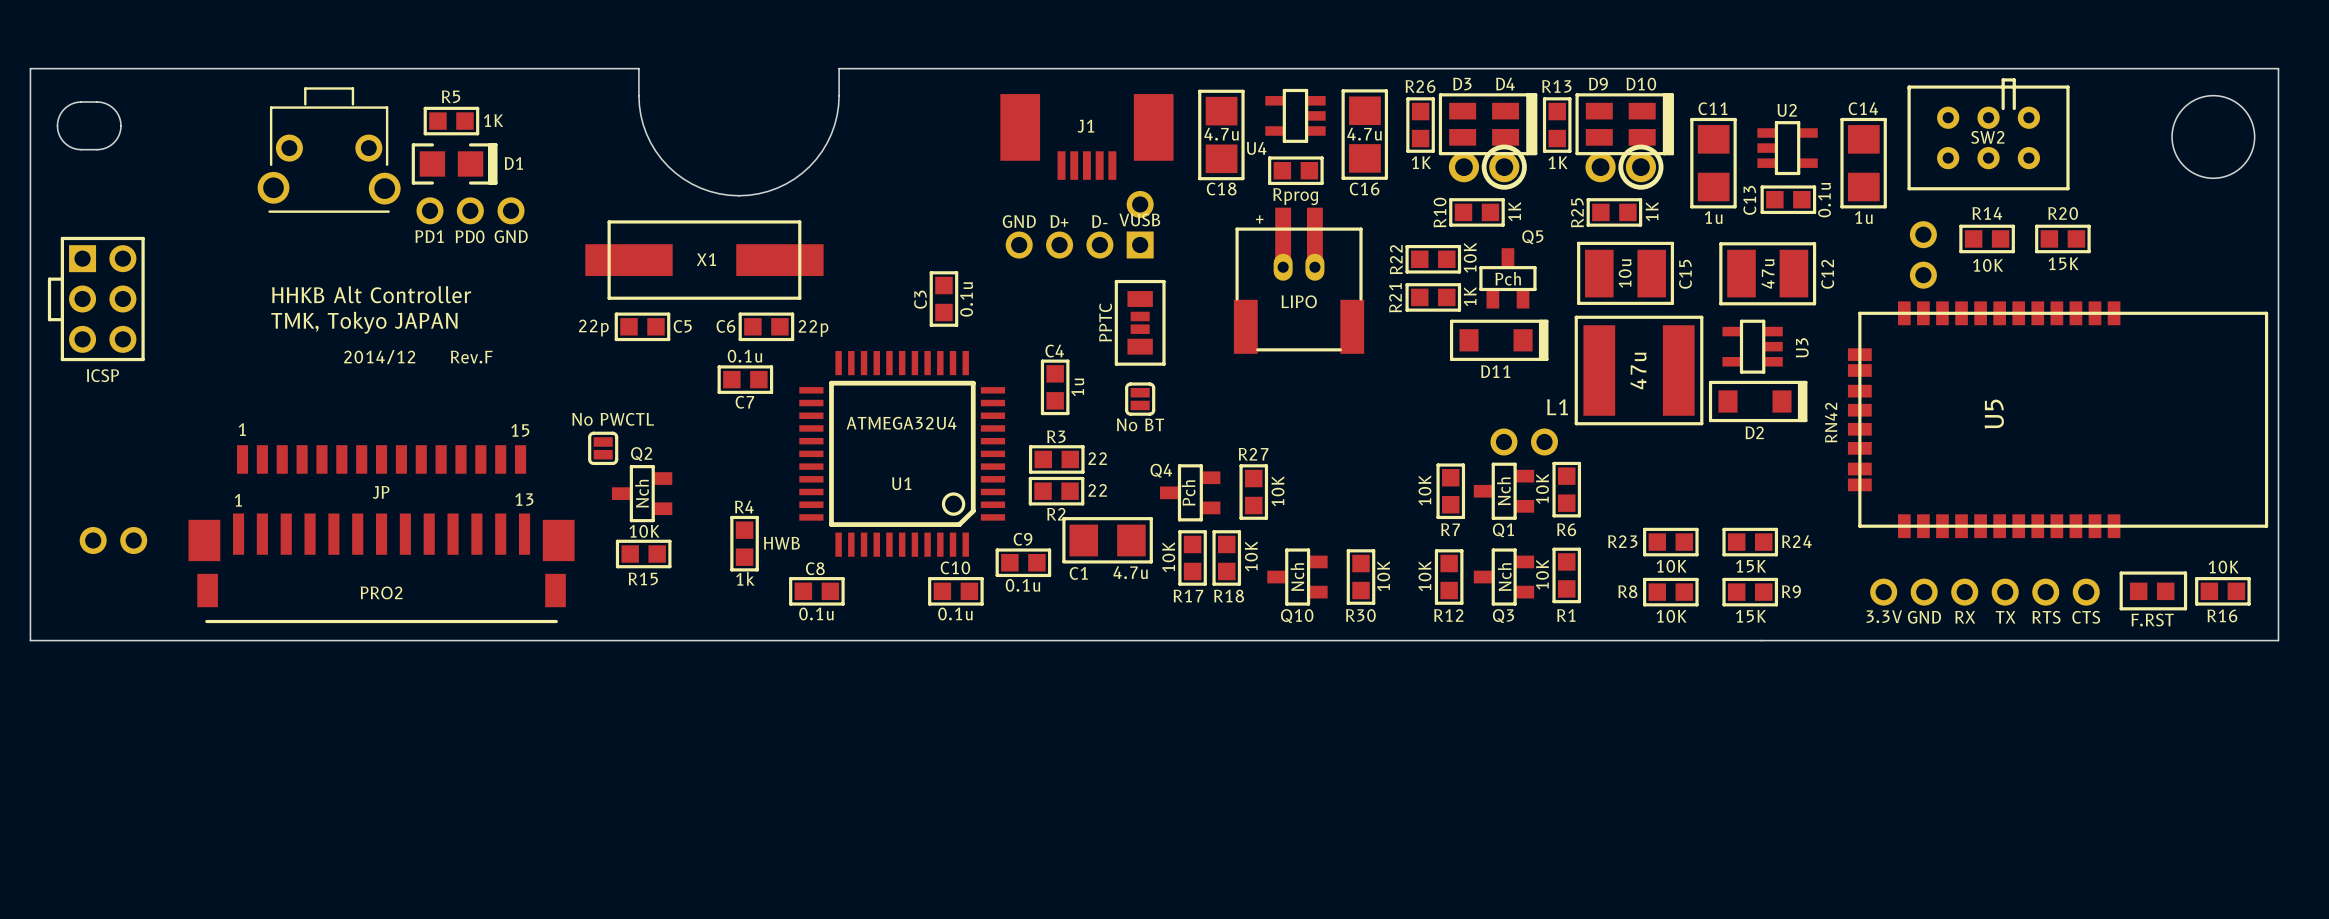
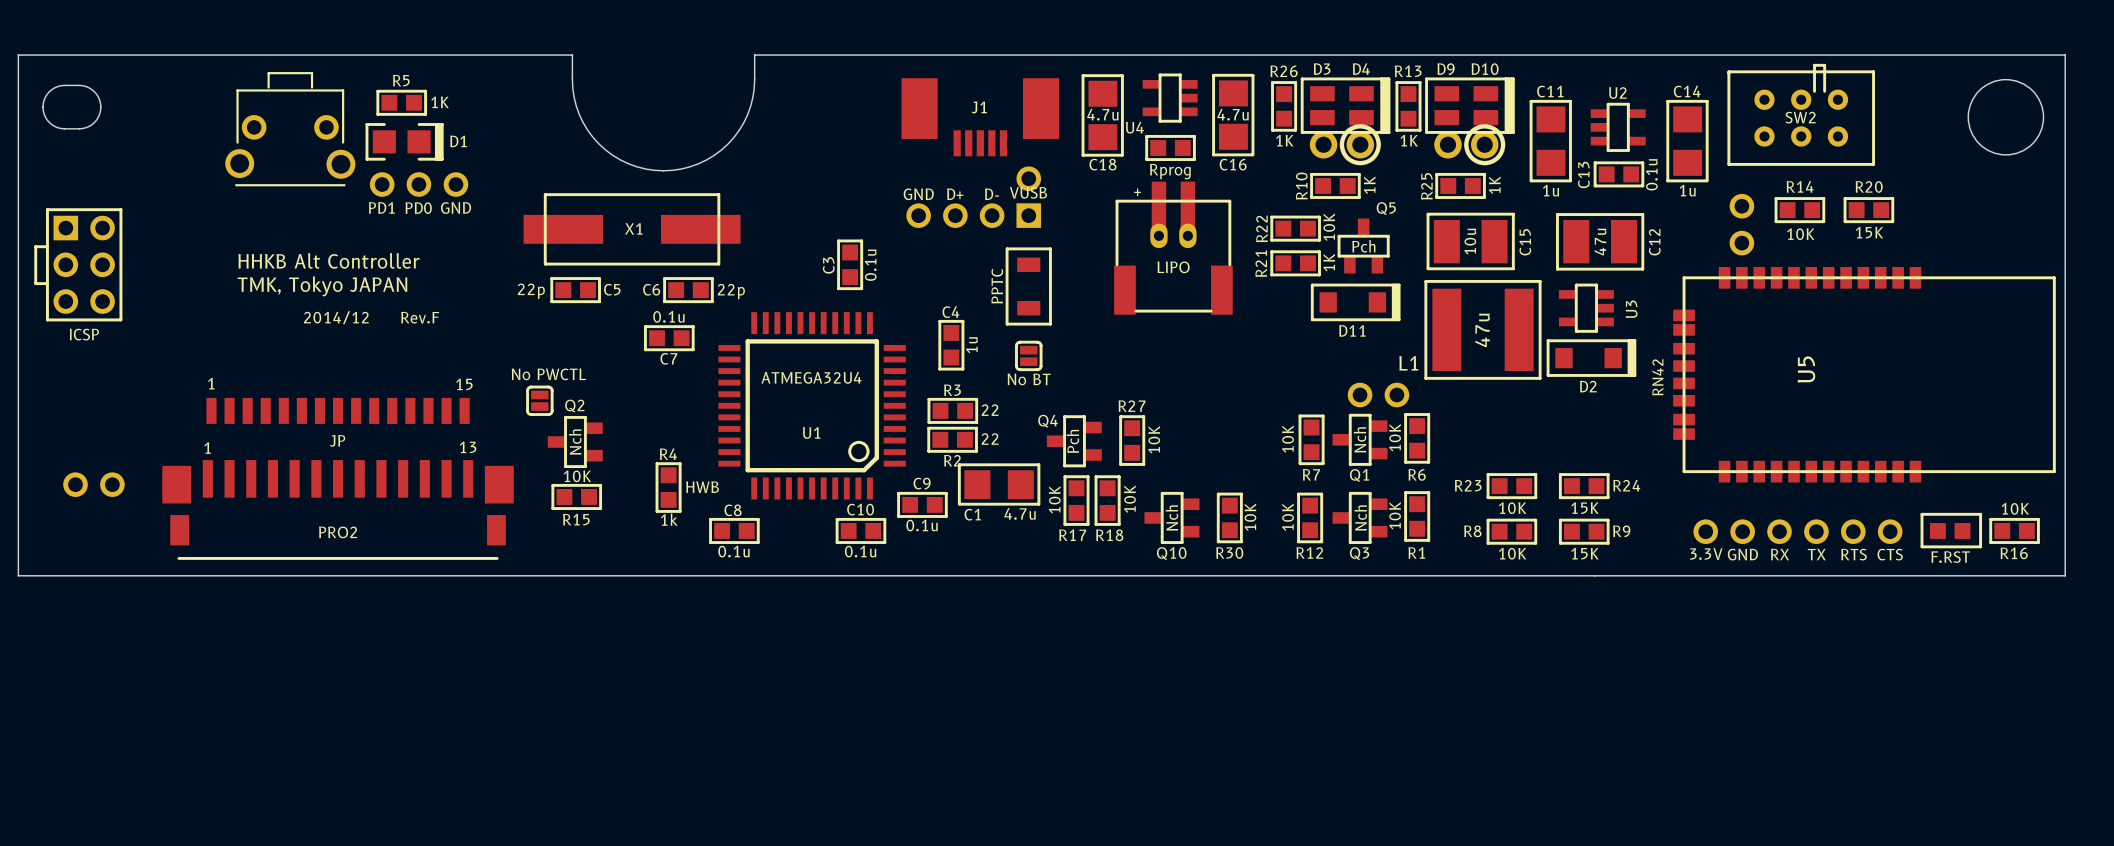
part: (1140, 322) -> none

